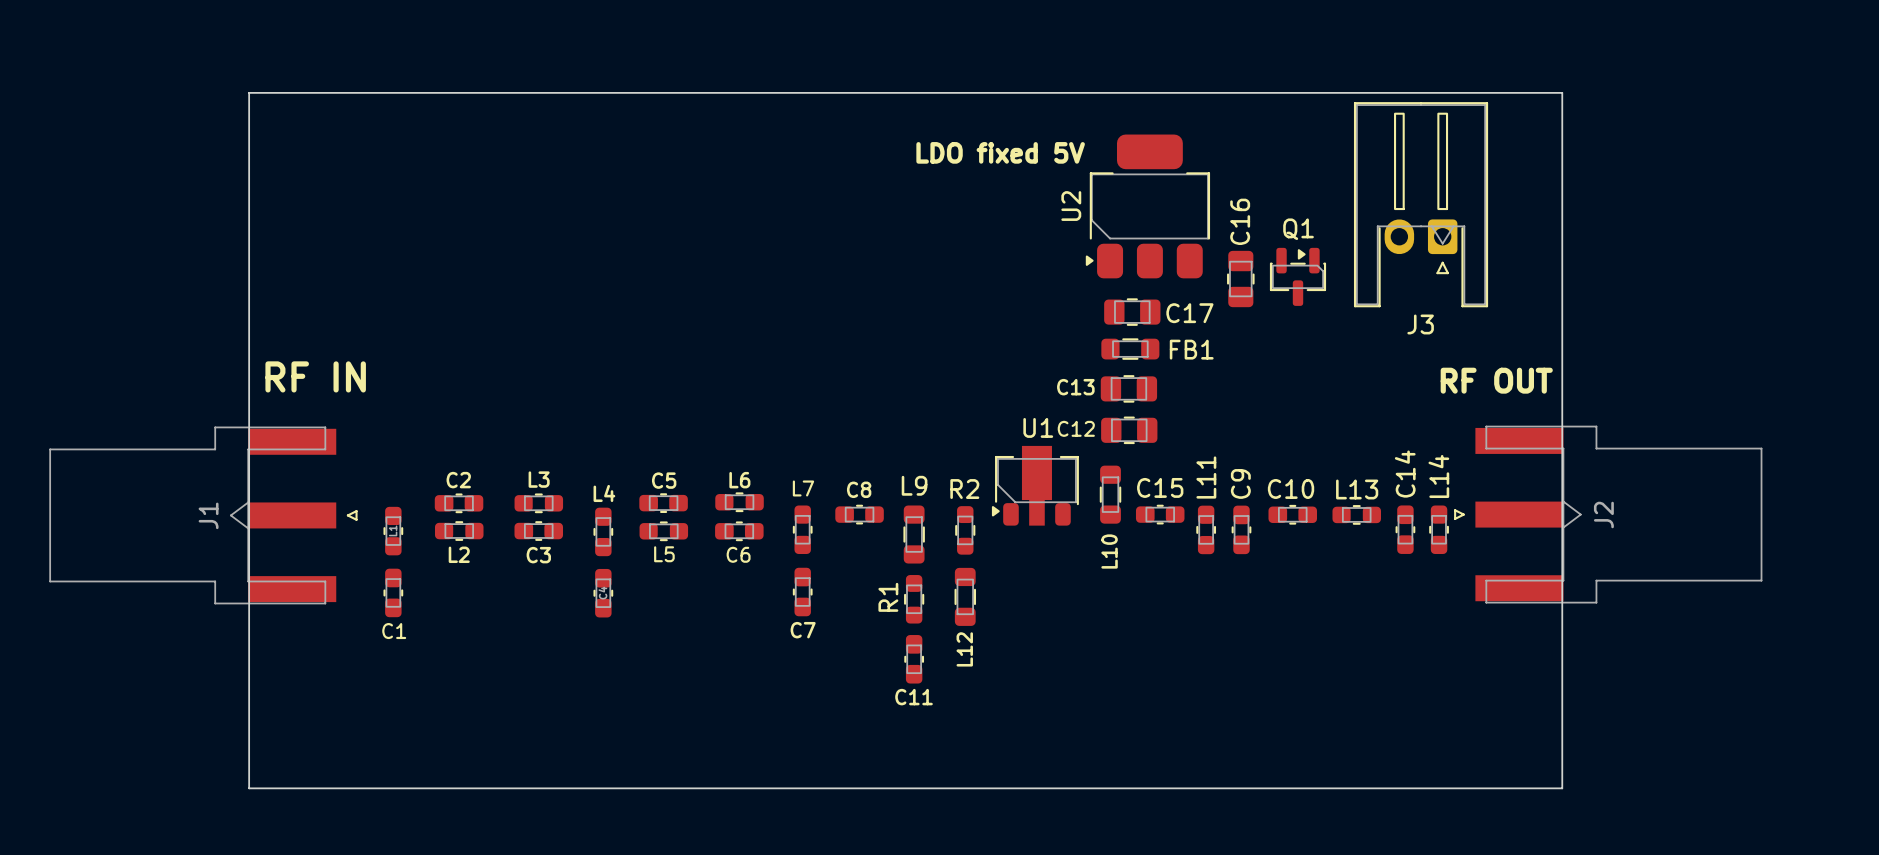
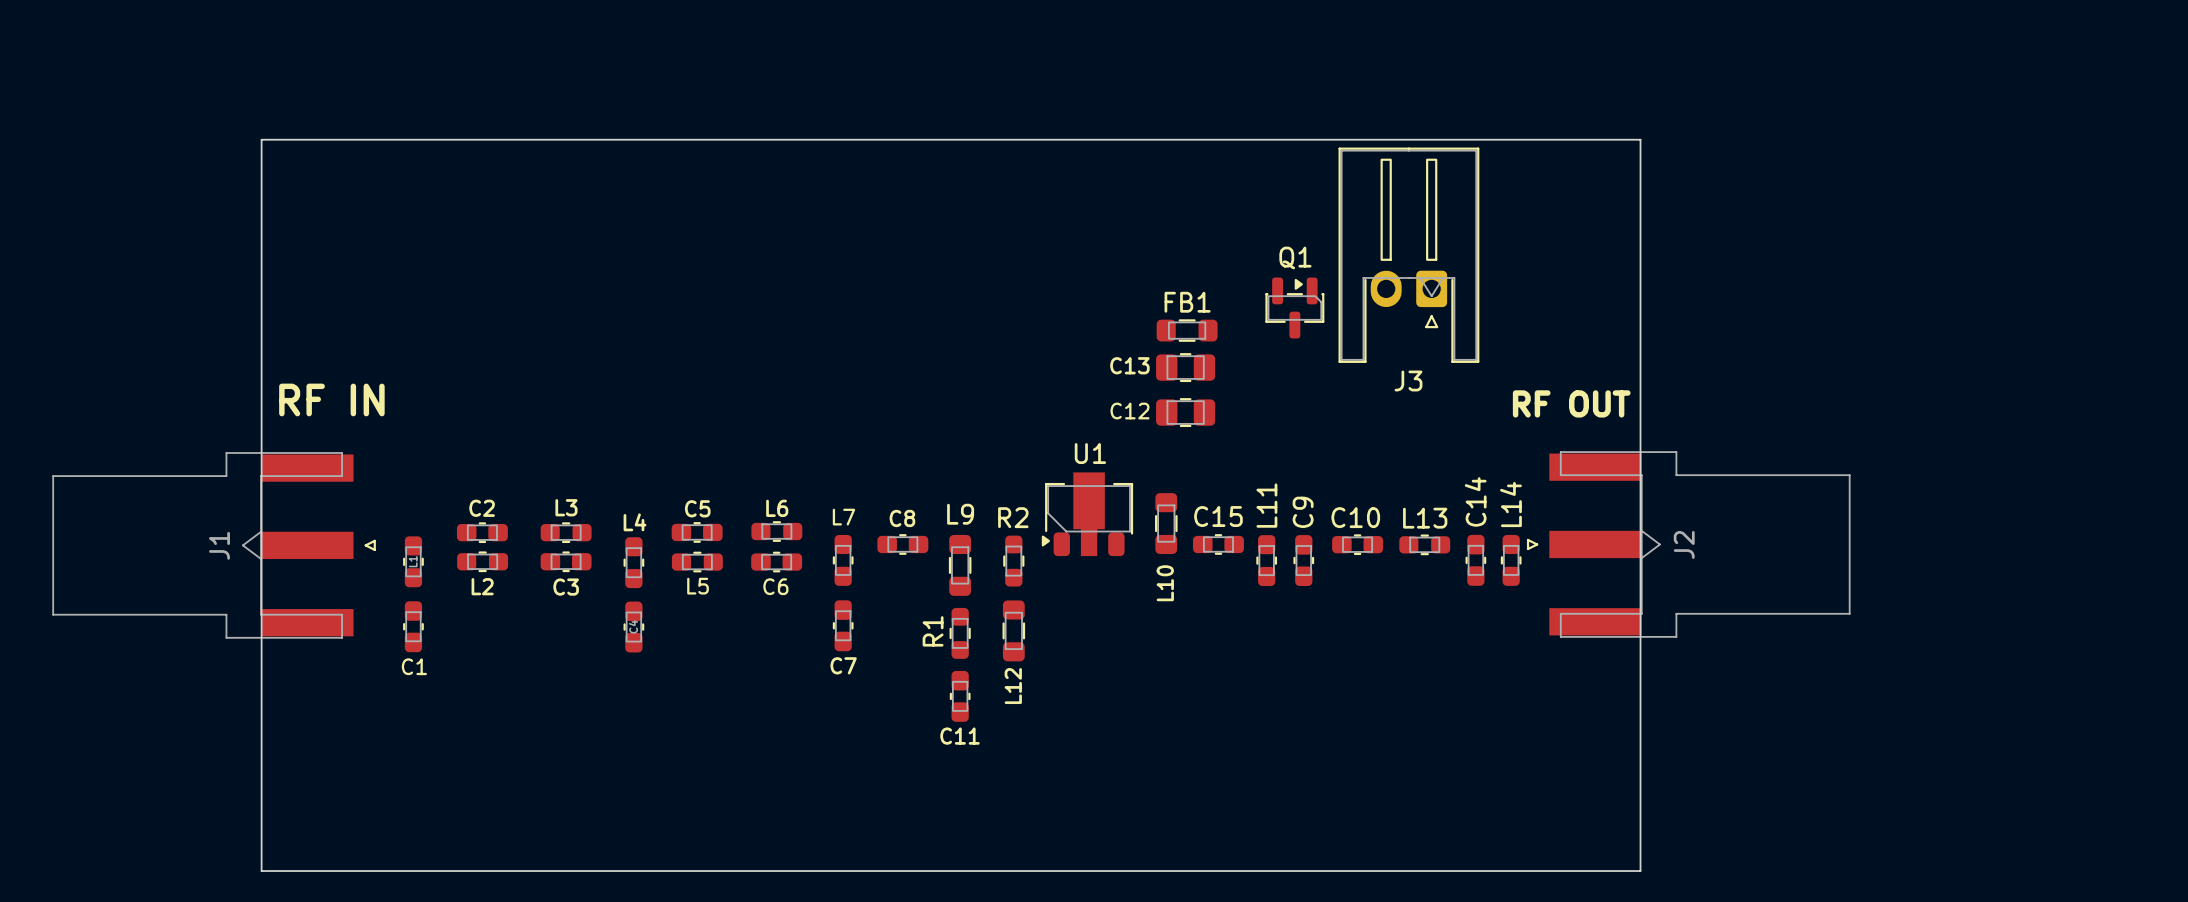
board edge: (1562, 129) (1562, 92) (249, 92) (249, 788) (1562, 788) -> (1640, 139) (261, 139) (261, 871) (1640, 871) (1640, 831)
text: LDO fixed 5V (1000, 152) -> none
J3 position: (1421, 204) -> (1408, 255)
U2: (1147, 206) -> none
Q1 position: (1297, 276) -> (1294, 308)
C16: (1240, 279) -> none
C17: (1132, 312) -> none
C13: none -> (1185, 367)
FB1 position: (1130, 349) -> (1187, 330)
FB1 name position: FB1 (1191, 349) -> FB1 (1187, 302)
C13 name: C13 (1075, 387) -> C12 (1129, 411)
C12: (1129, 430) -> none

